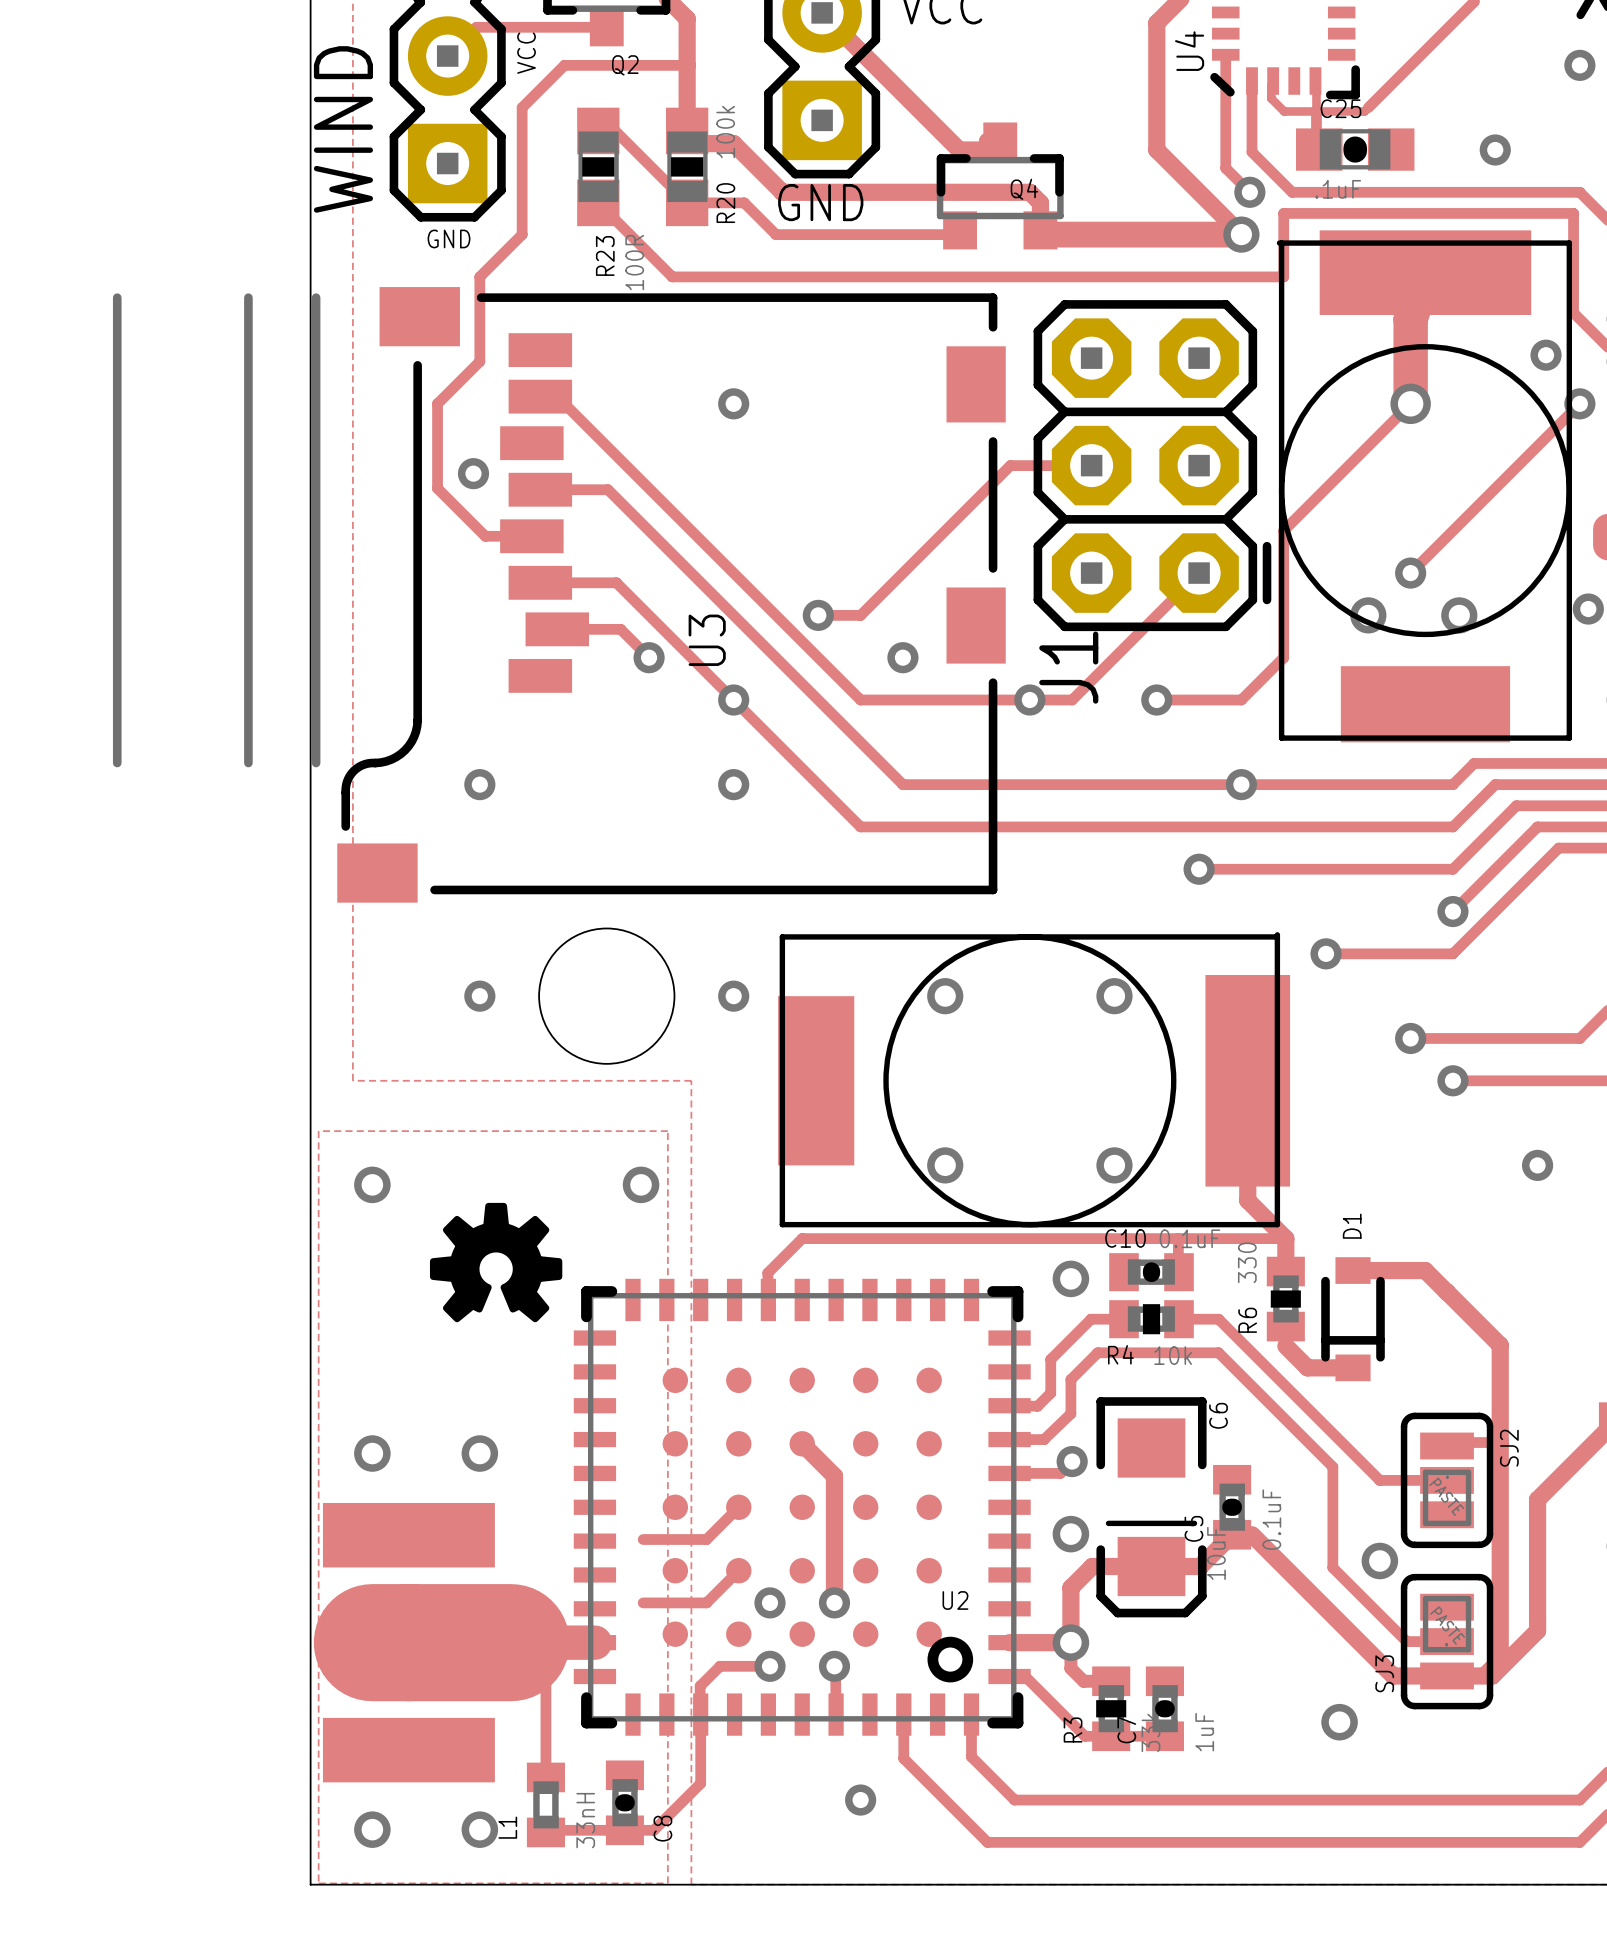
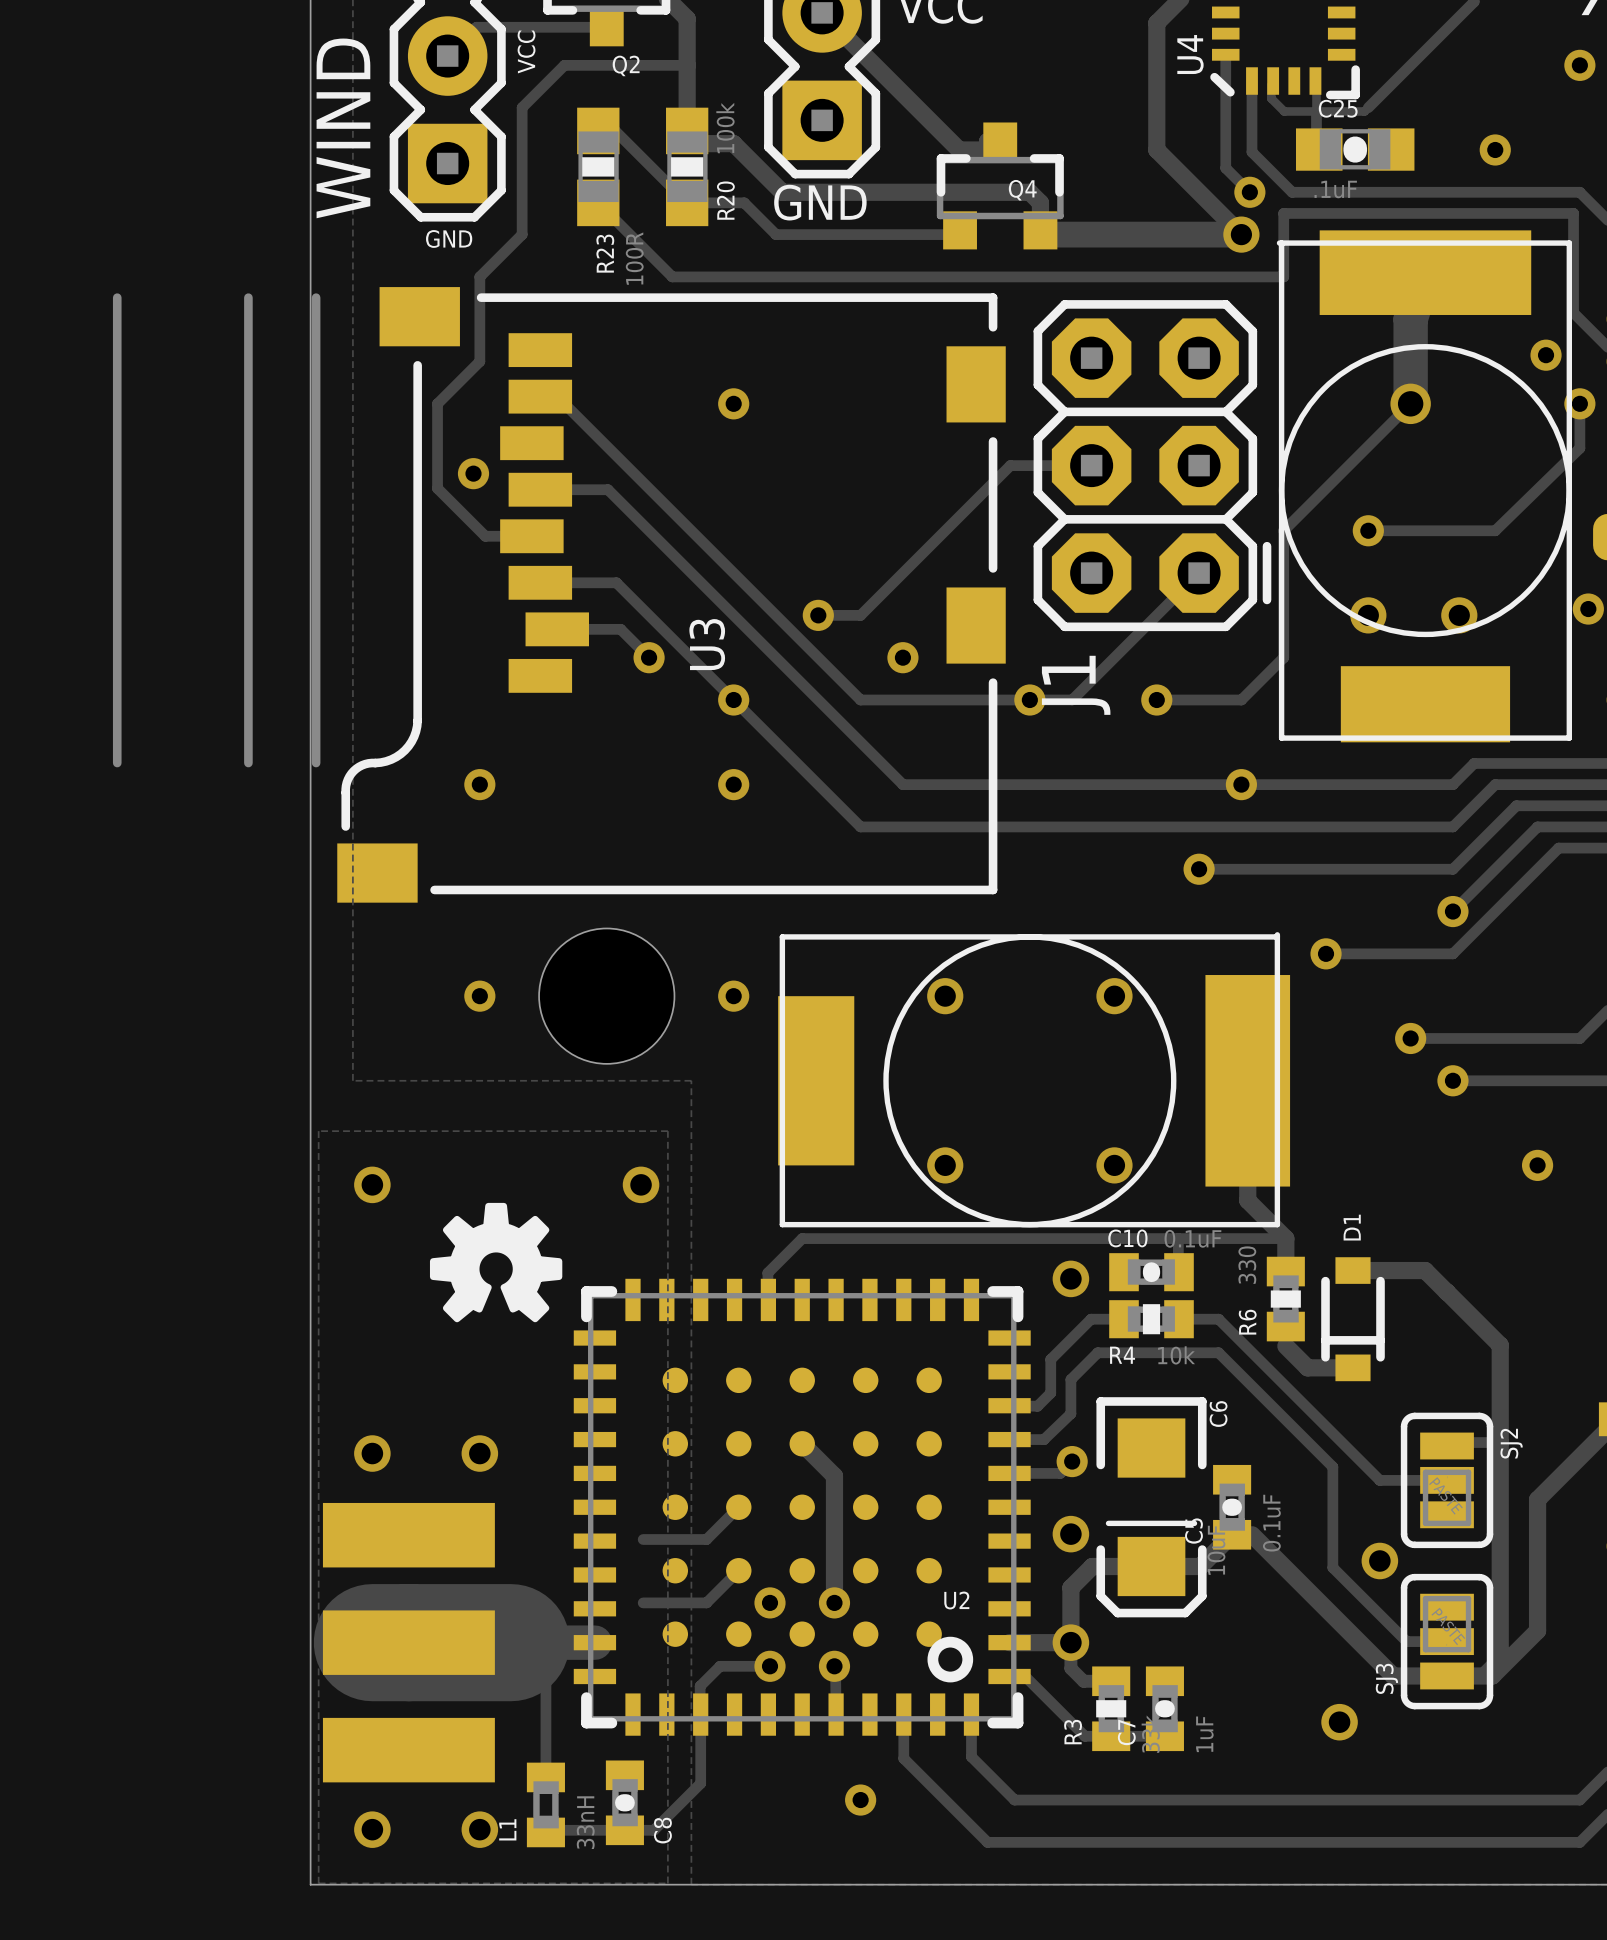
track: (1579, 403) (1410, 573) -> (1579, 403) (1579, 448) (1495, 530) (1368, 530)
via position: (1410, 573) -> (1368, 530)

